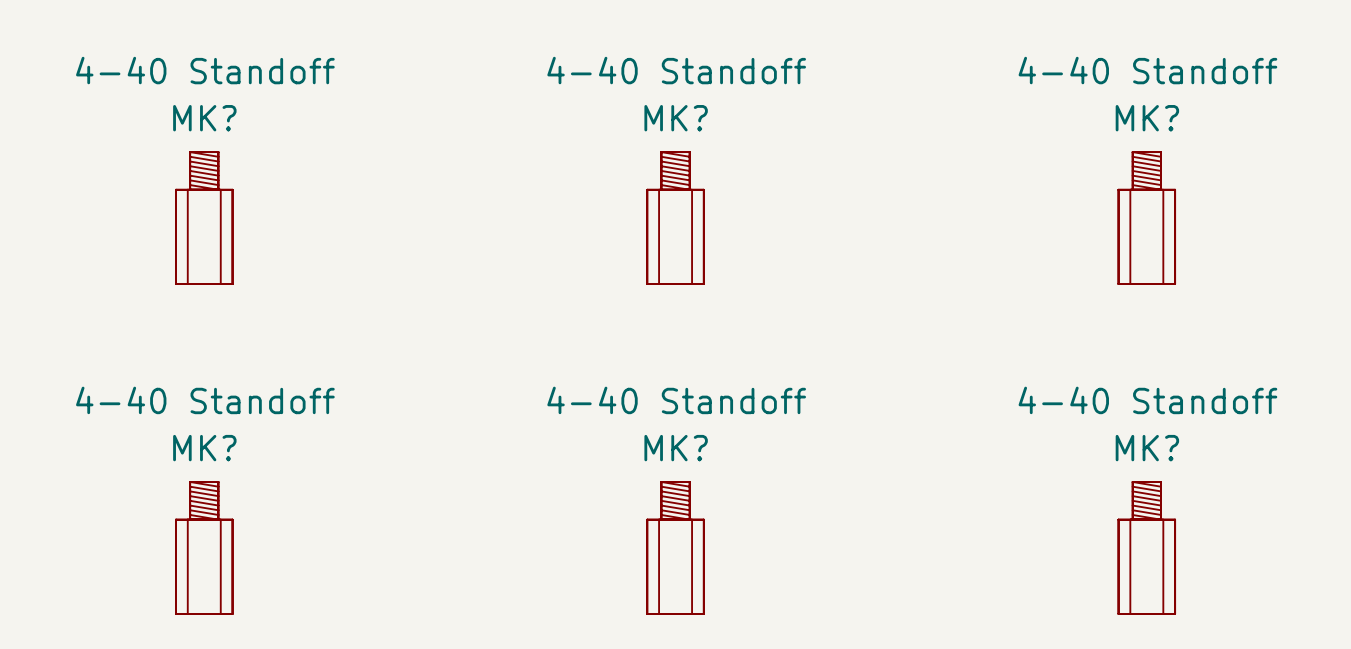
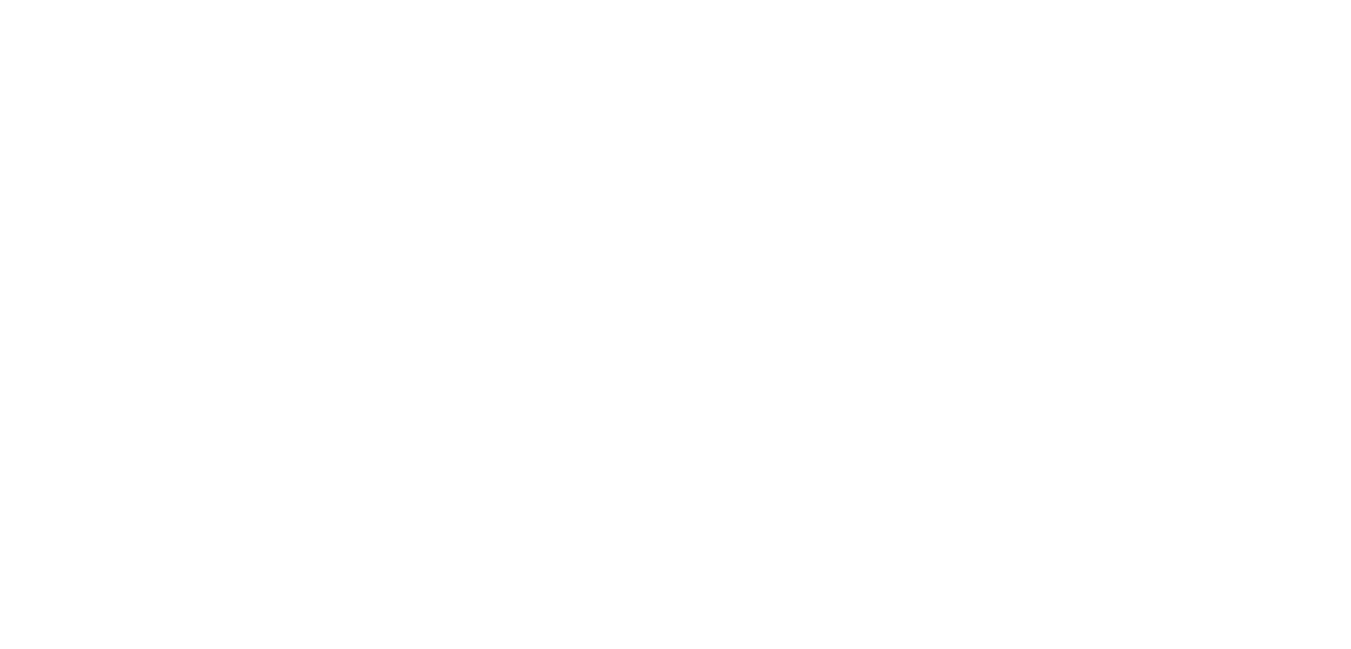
MK?: 4-40 Standoff (204, 218) -> none
MK?: 4-40 Standoff (675, 218) -> none
MK?: 4-40 Standoff (1146, 218) -> none
MK?: 4-40 Standoff (204, 547) -> none
MK?: 4-40 Standoff (675, 547) -> none
MK?: 4-40 Standoff (1146, 547) -> none

